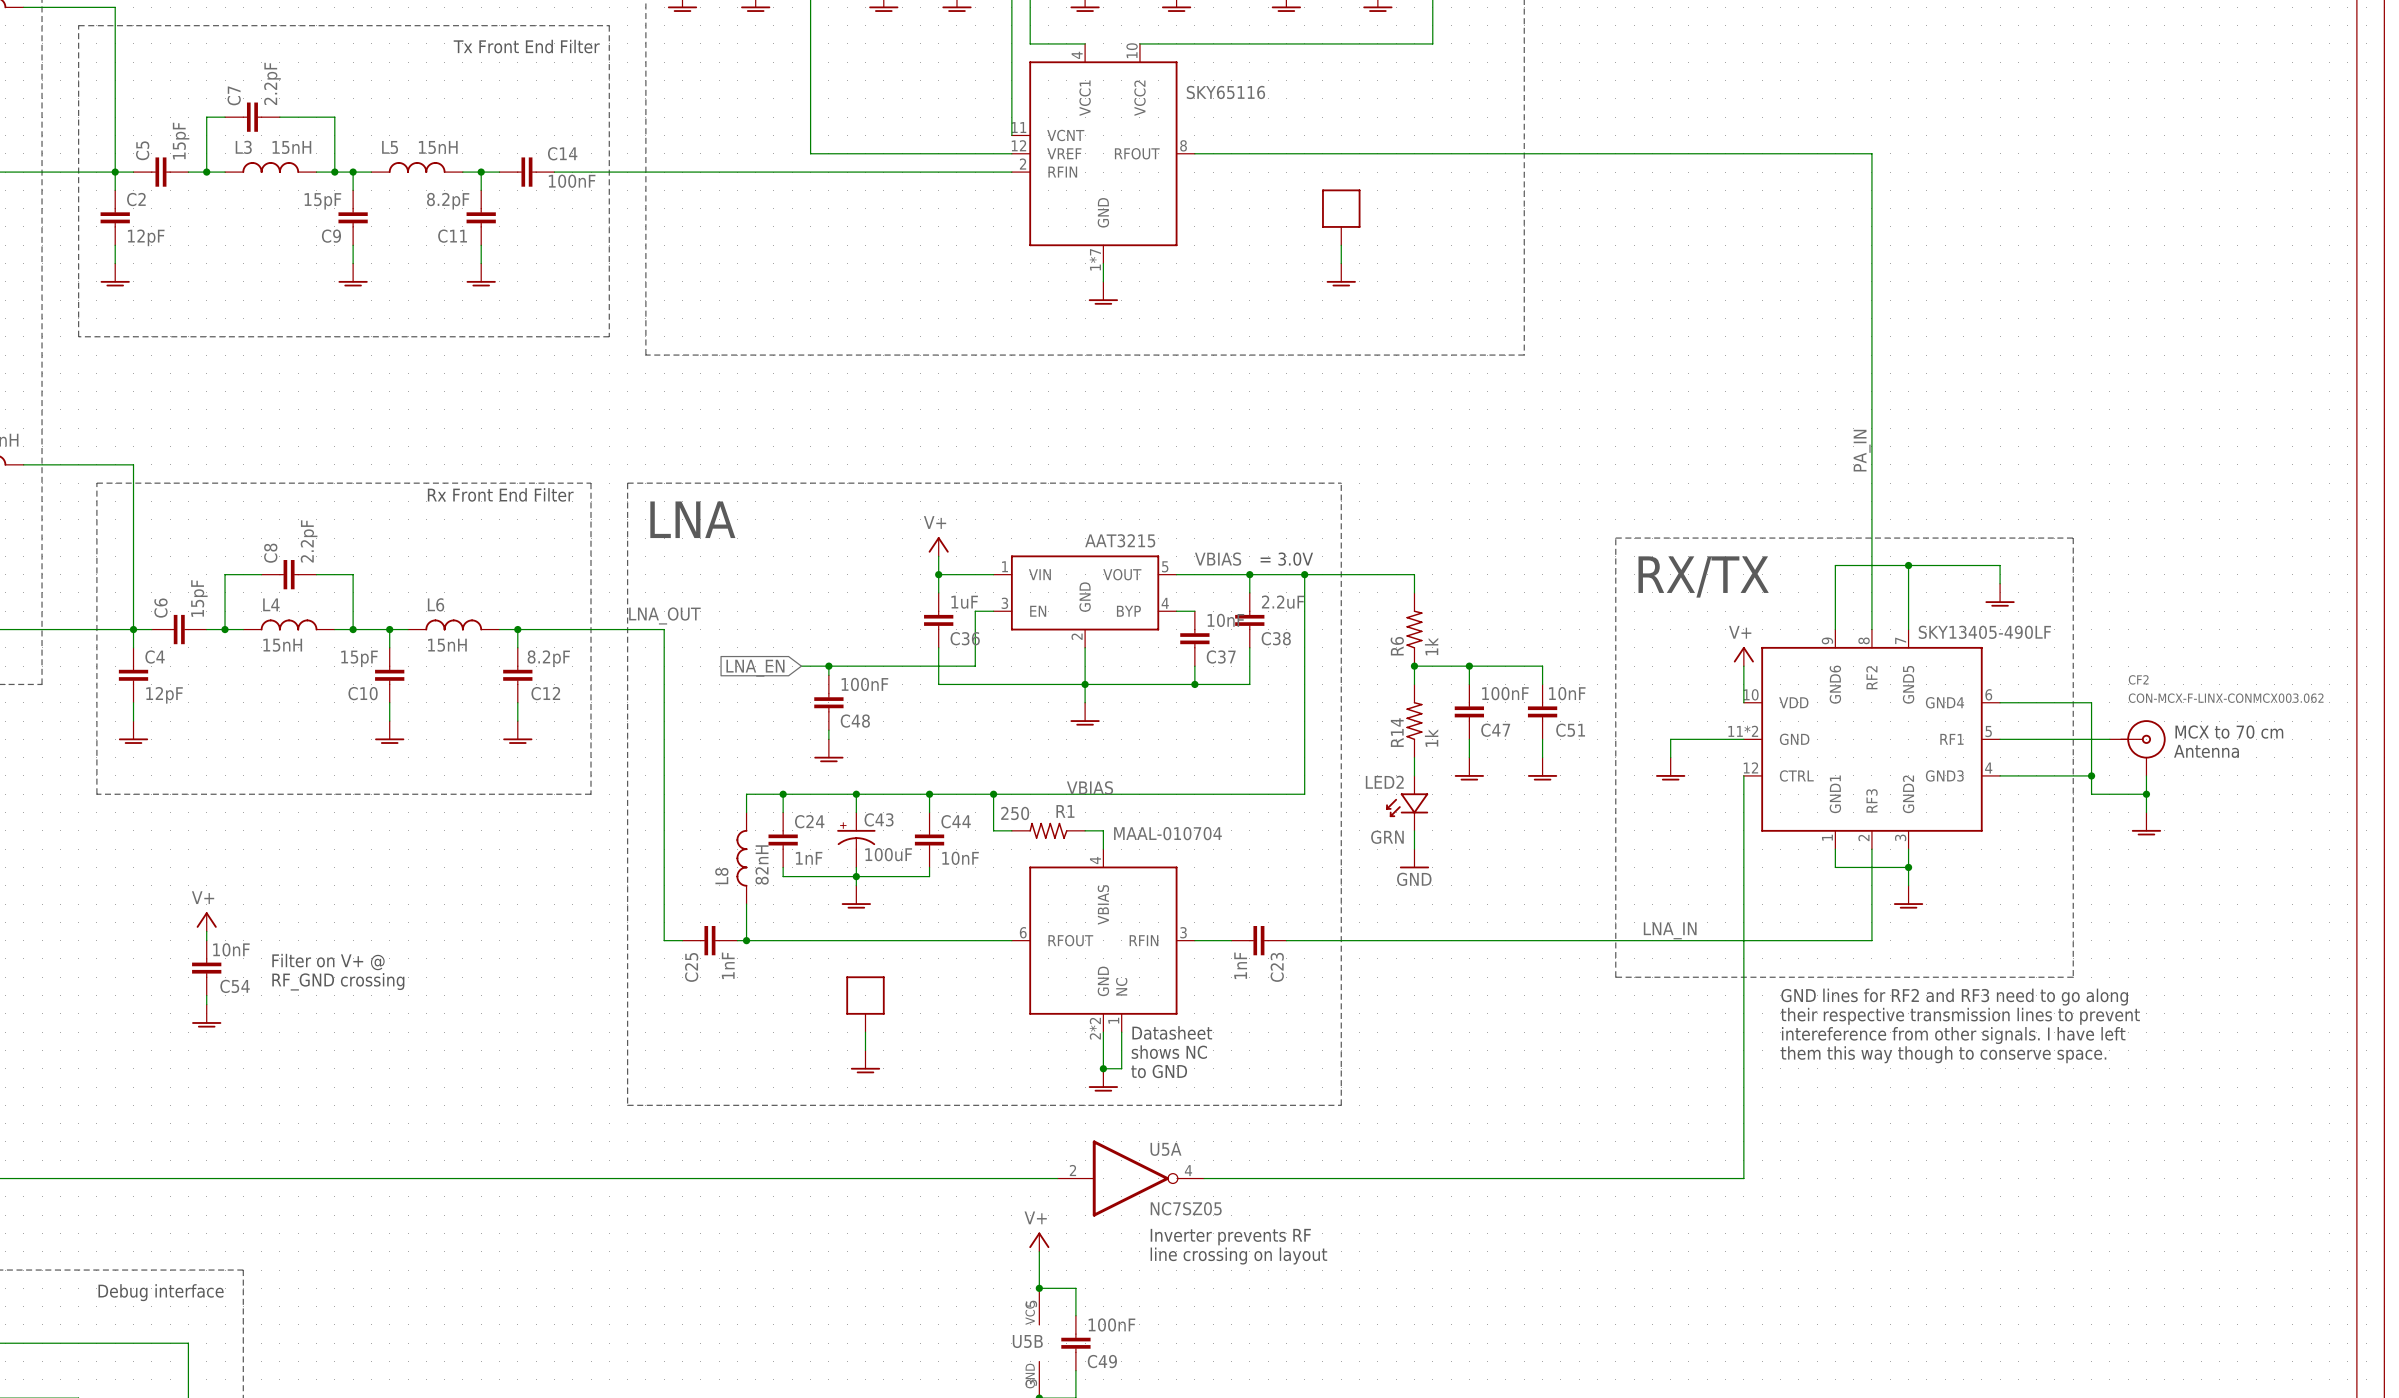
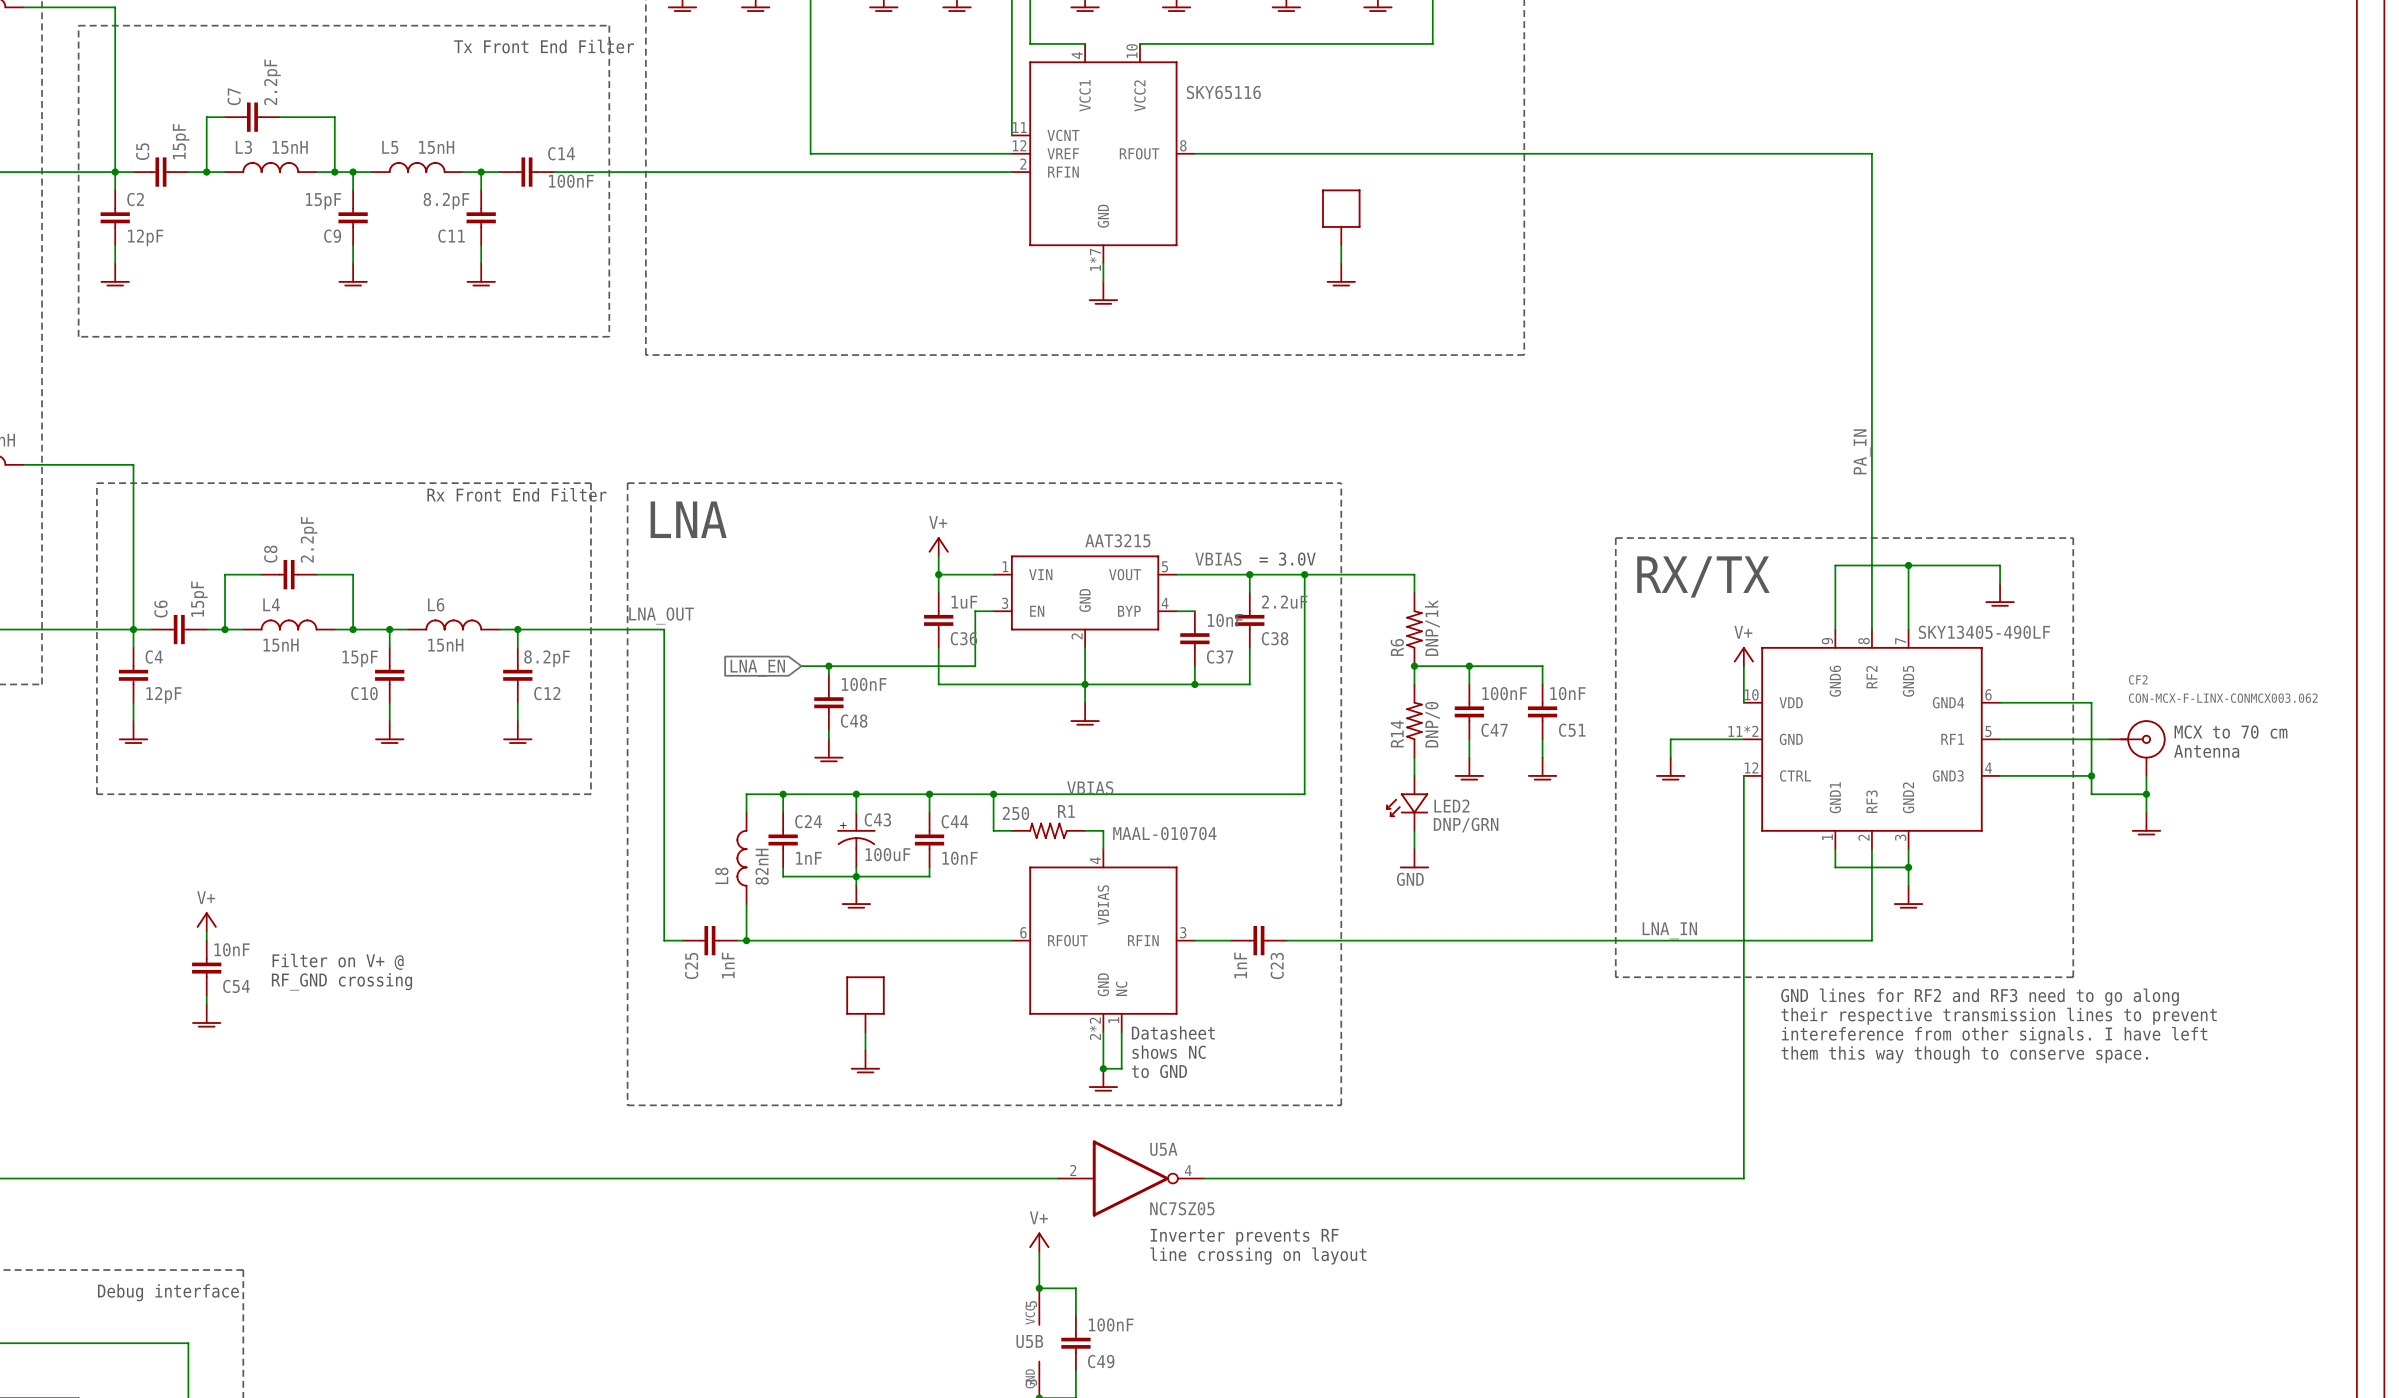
R6 value: 1k (1431, 646) -> DNP/1k (1432, 628)
R14 value: 1k (1431, 738) -> DNP/0 (1432, 724)
LED2 name position: LED2 (1384, 782) -> LED2 (1451, 806)
LED2 value: GRN (1387, 837) -> DNP/GRN (1466, 825)

